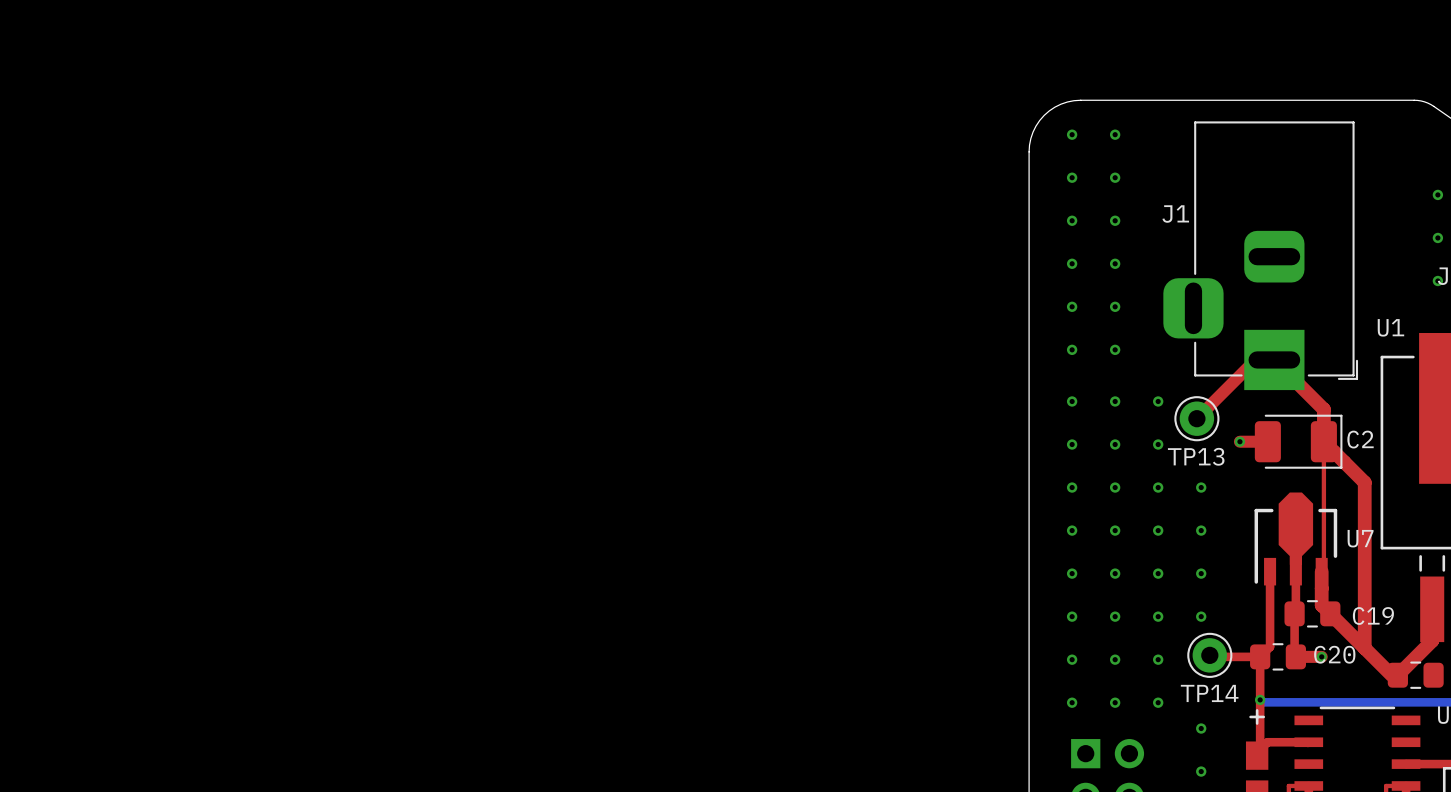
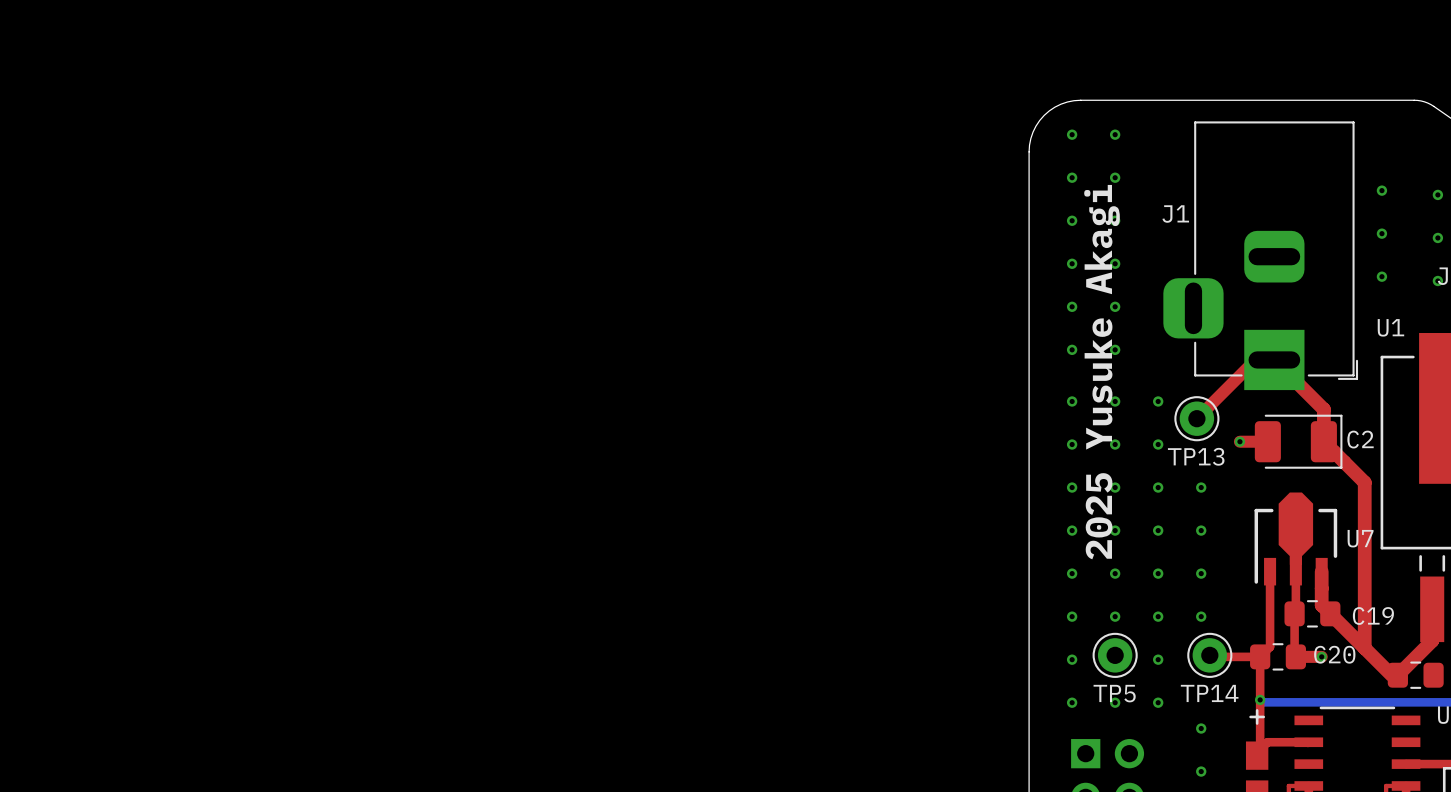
via: none -> (1381, 190)
via: none -> (1381, 233)
via: none -> (1381, 276)
text: none -> 2025 Yusuke Akagi (1102, 372)
top track: (1323, 441) (1323, 586) -> none
TP5: none -> (1115, 655)
via: (1115, 659) -> none

